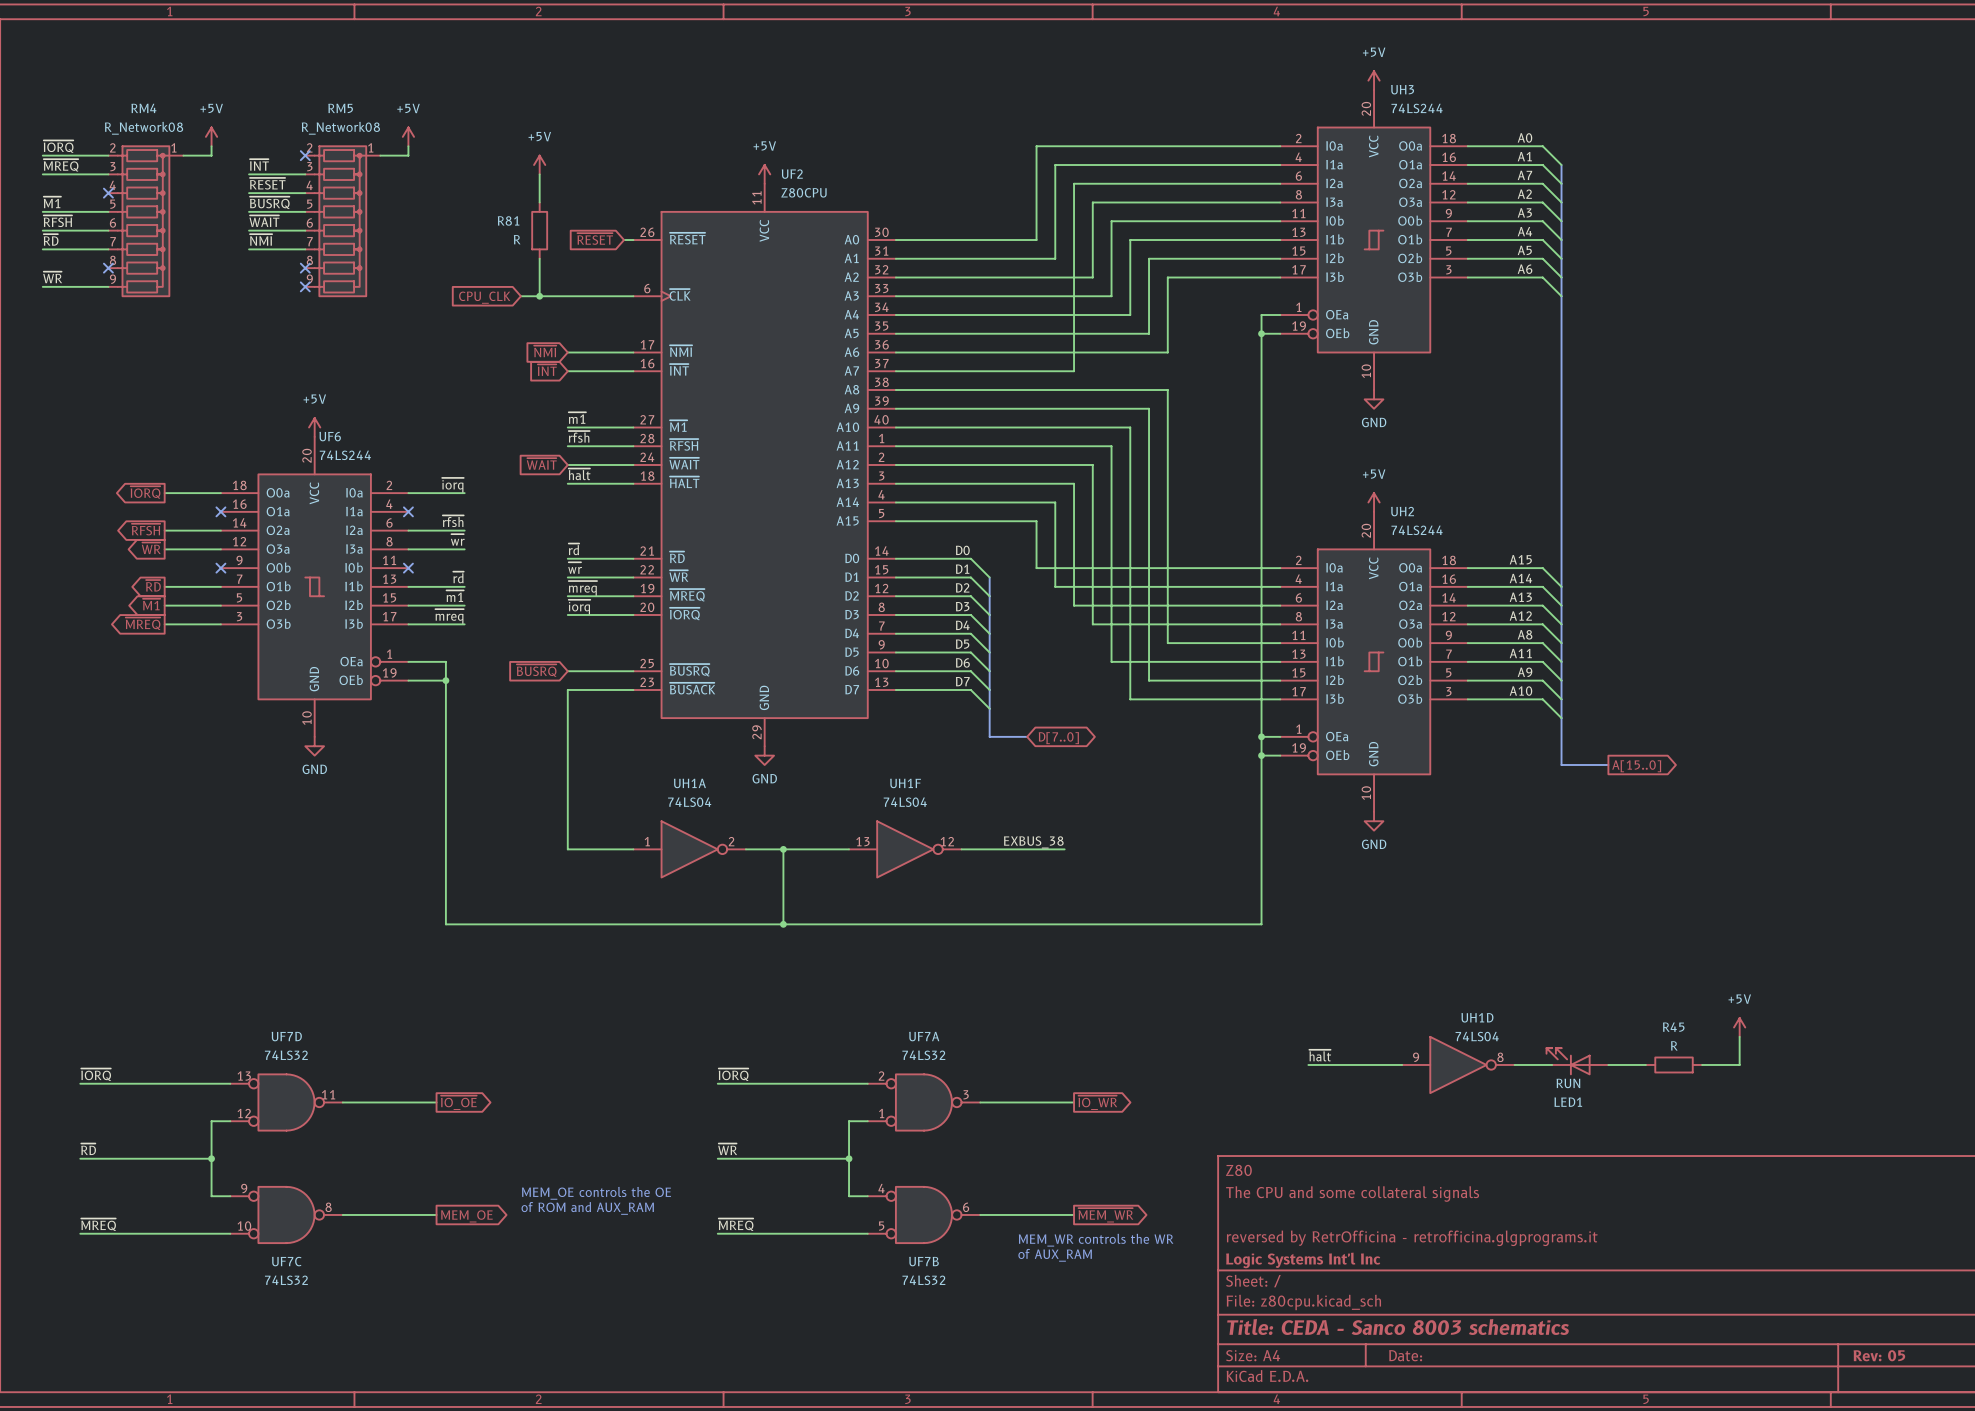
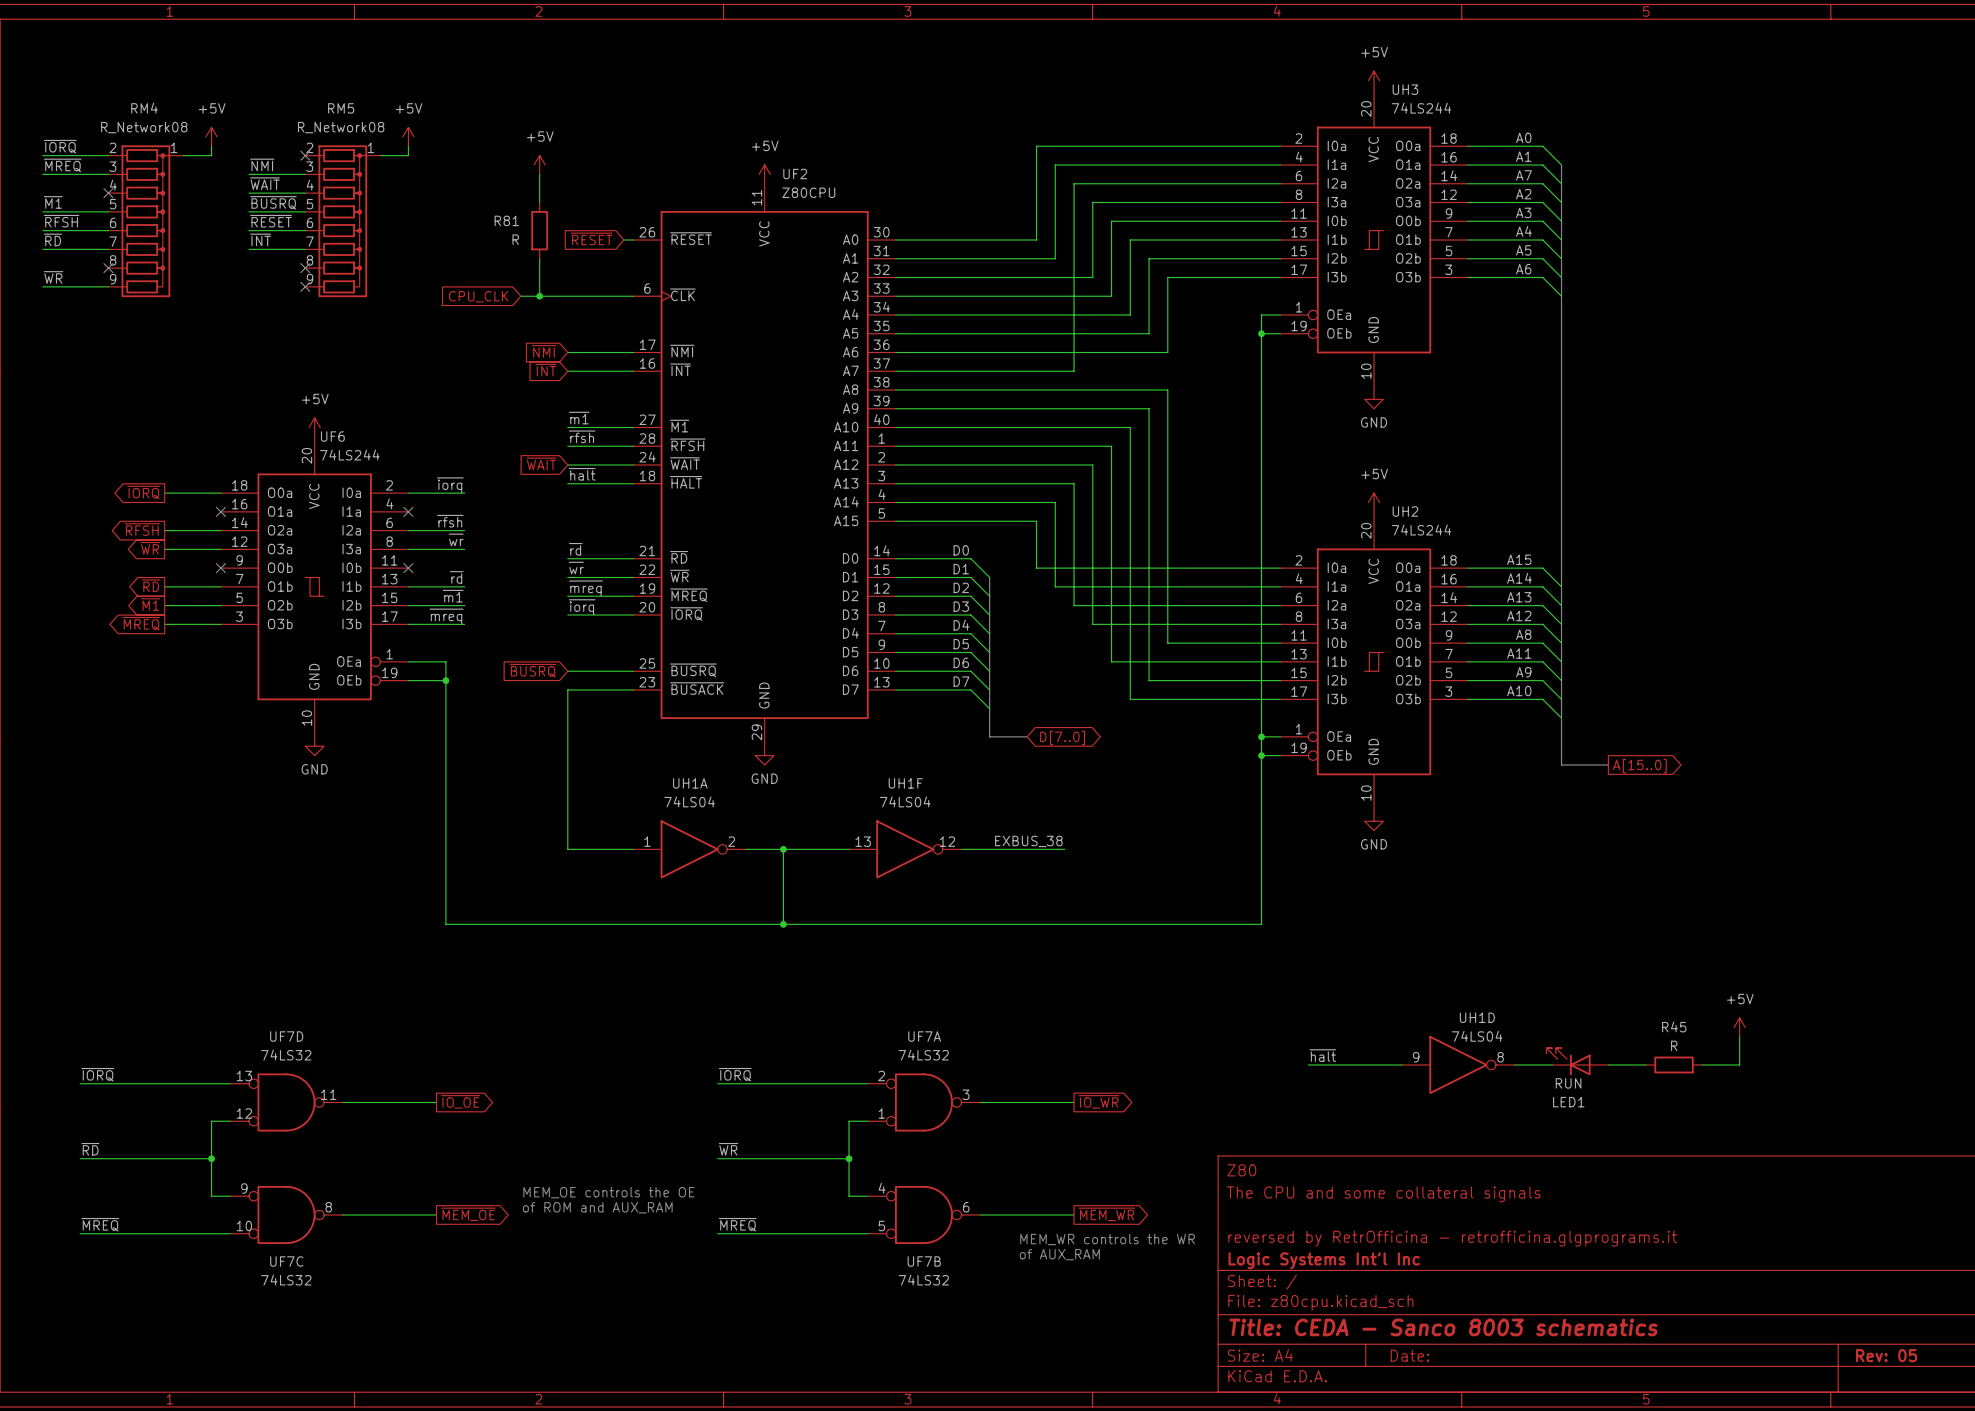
label: ~{INT} (259, 164) -> ~{NMI} (262, 164)
label: ~{RESET} (267, 183) -> ~{WAIT} (264, 183)
label: ~{WAIT} (264, 221) -> ~{RESET} (271, 221)
label: ~{NMI} (261, 239) -> ~{INT} (260, 239)
global label: MEM_OE (466, 1216) -> ~{MEM_OE} (468, 1214)

